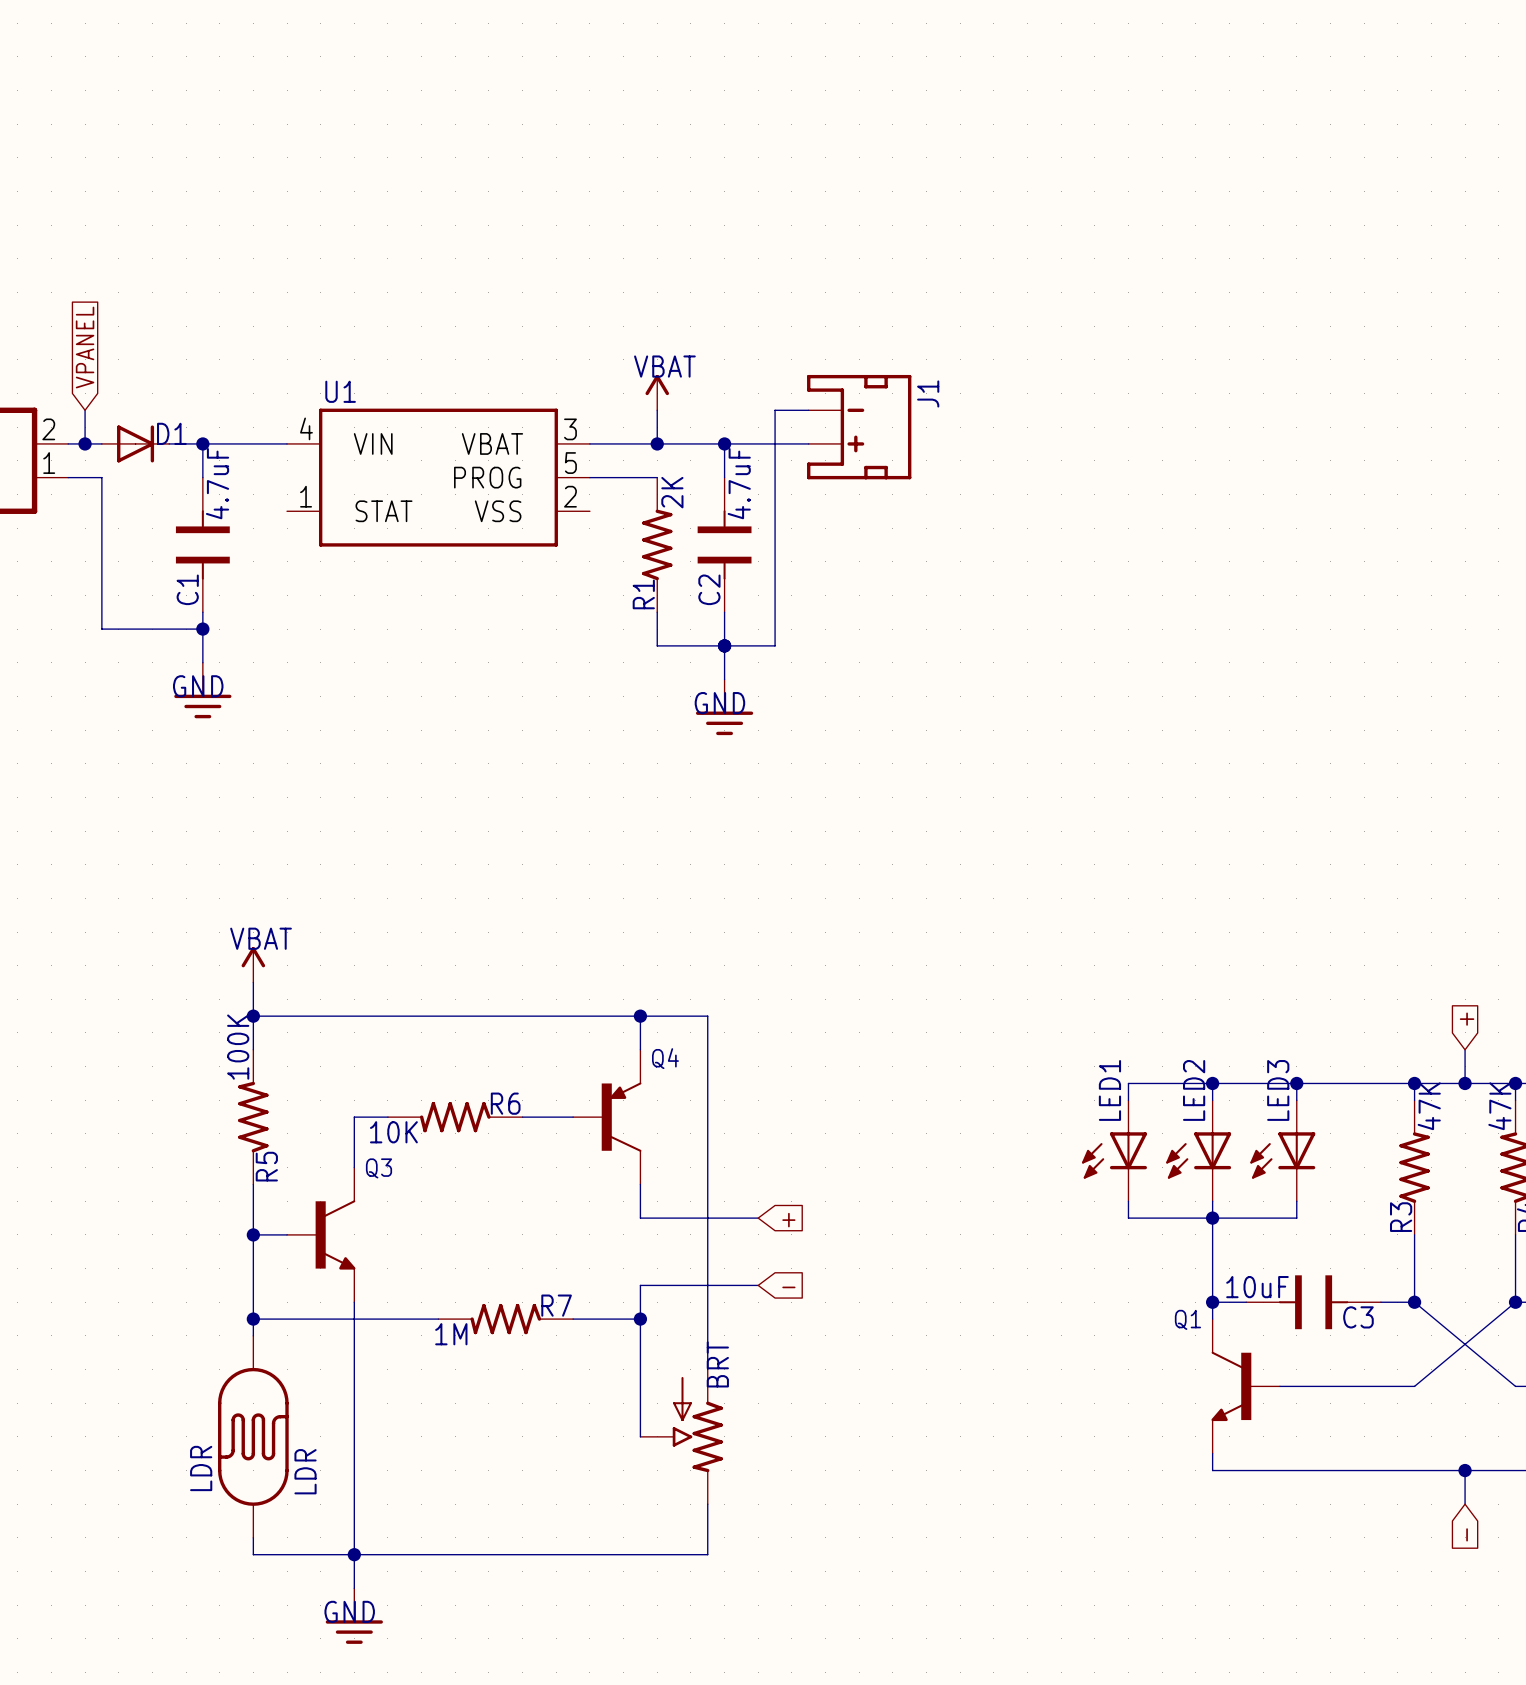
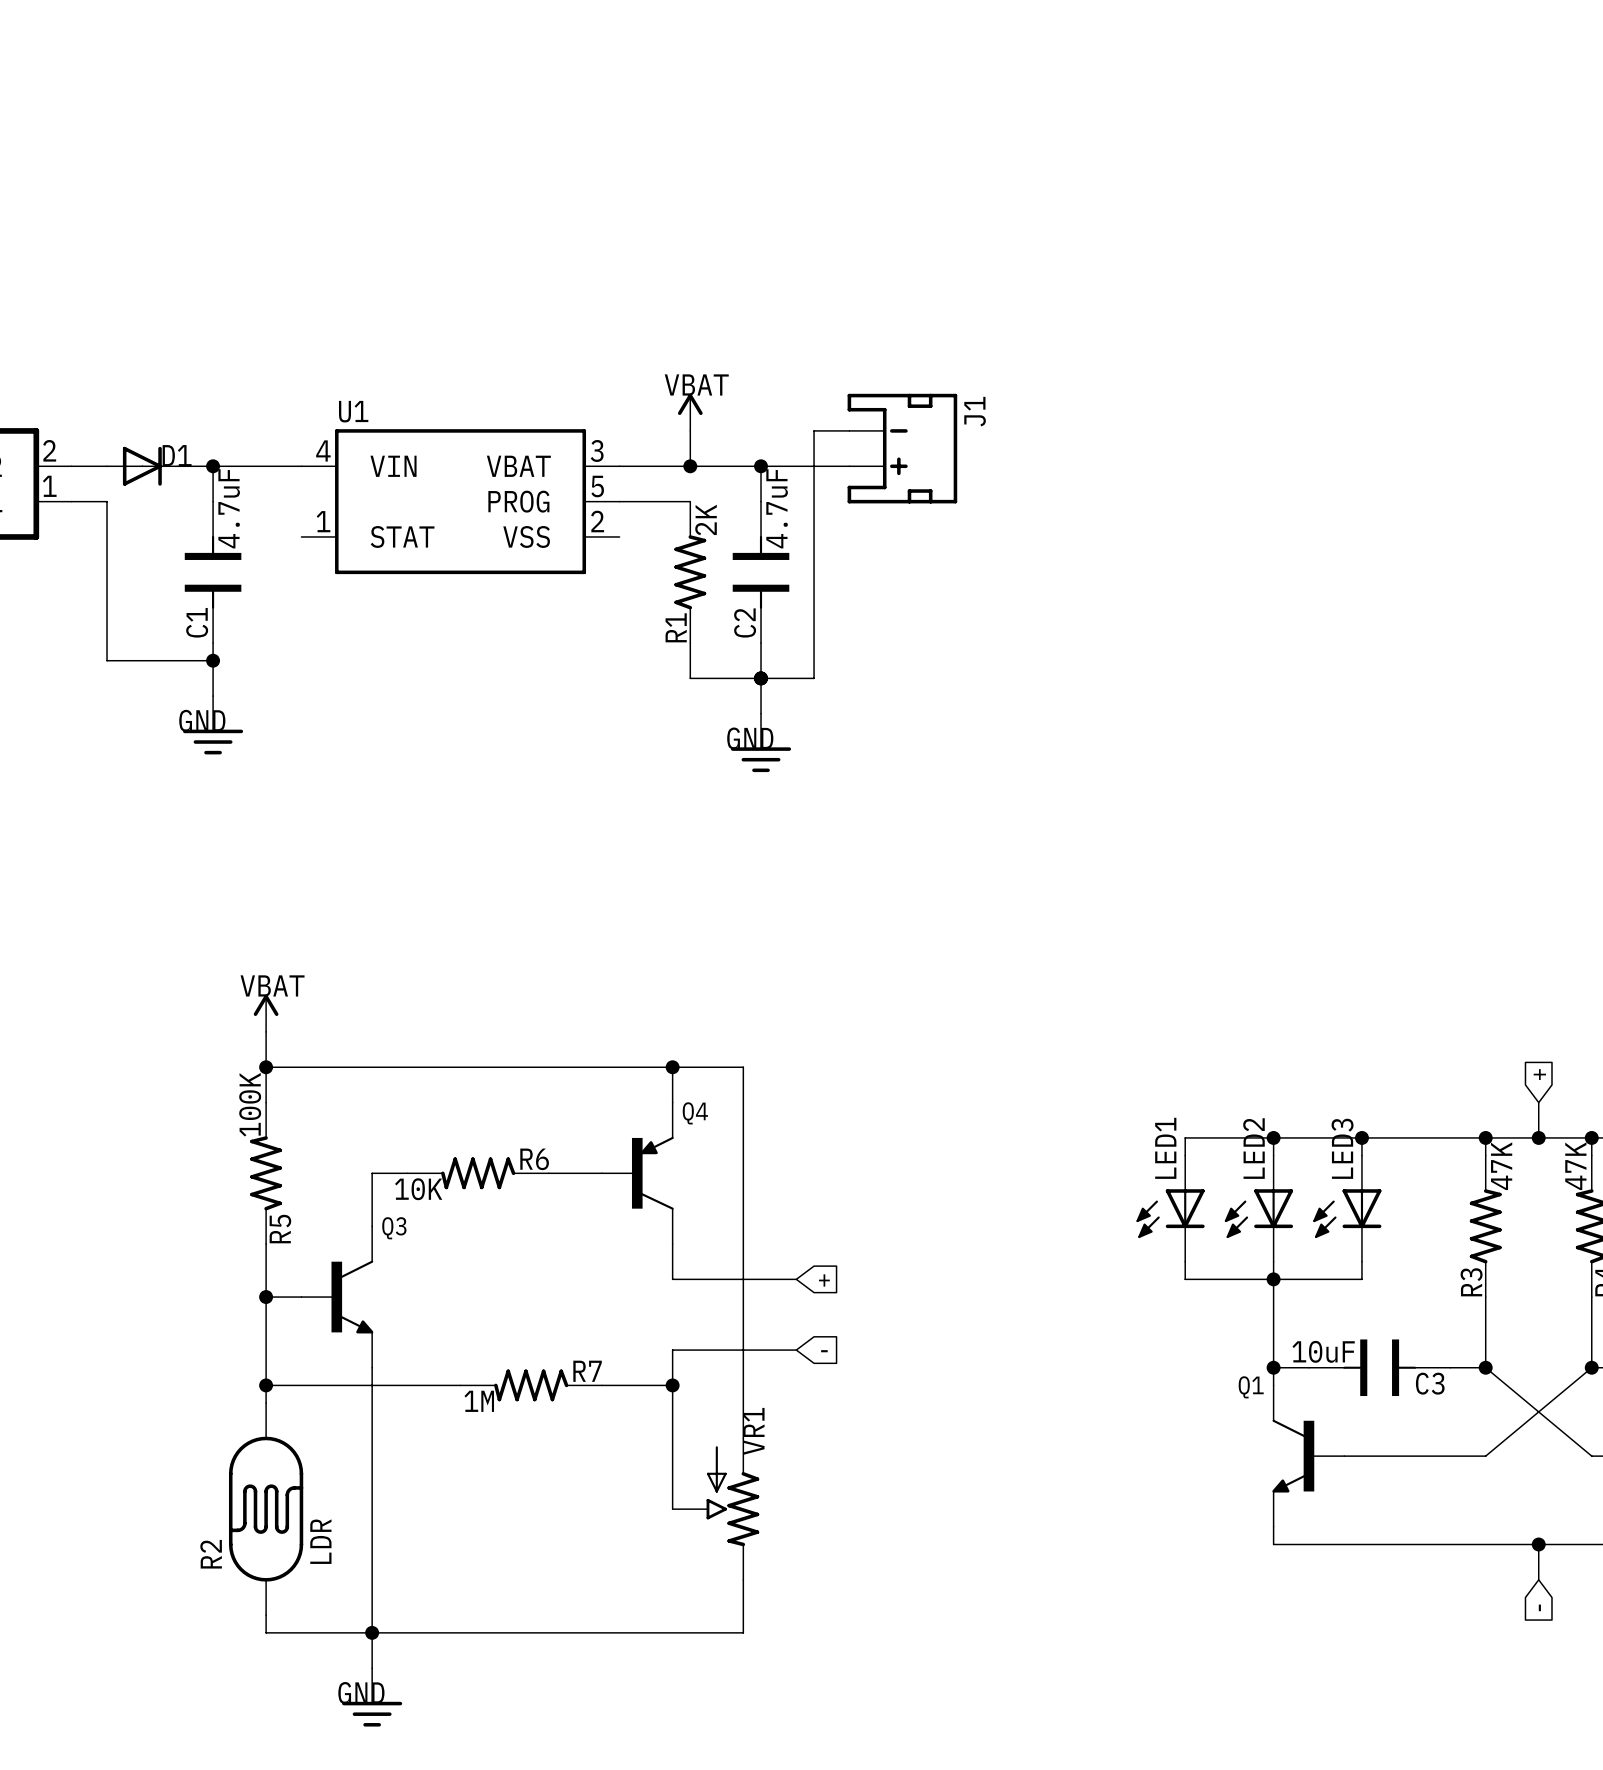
global label: VPANEL (85, 347) -> none
wire: (85, 410) (85, 443) -> none
junction: (85, 443) -> none
BRT name: BRT (717, 1364) -> VR1 (753, 1431)
LDR name: LDR (201, 1468) -> R2 (211, 1554)

